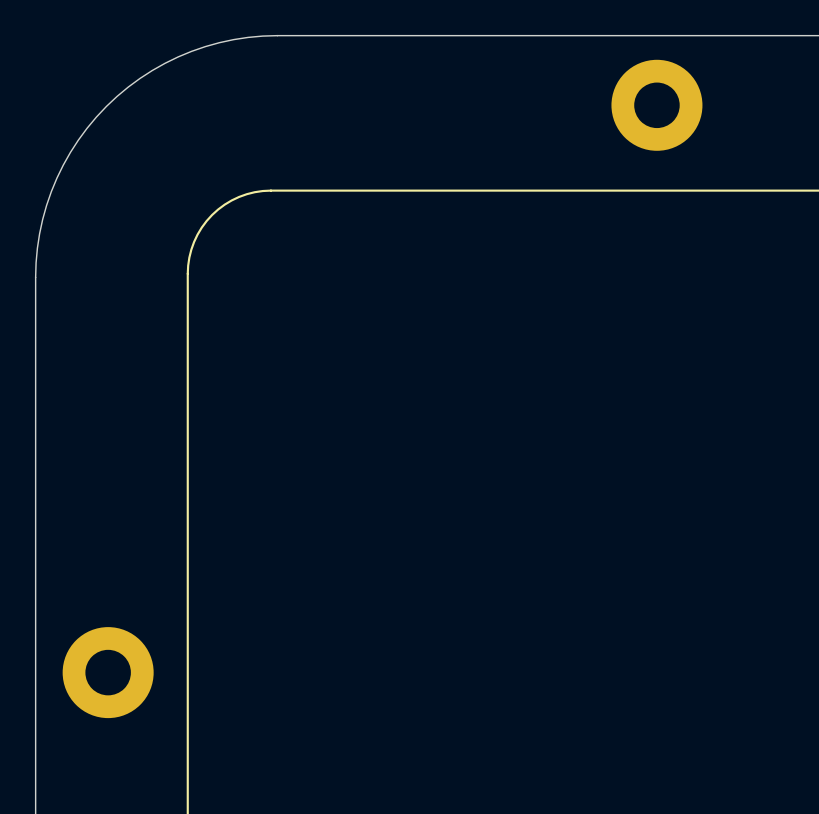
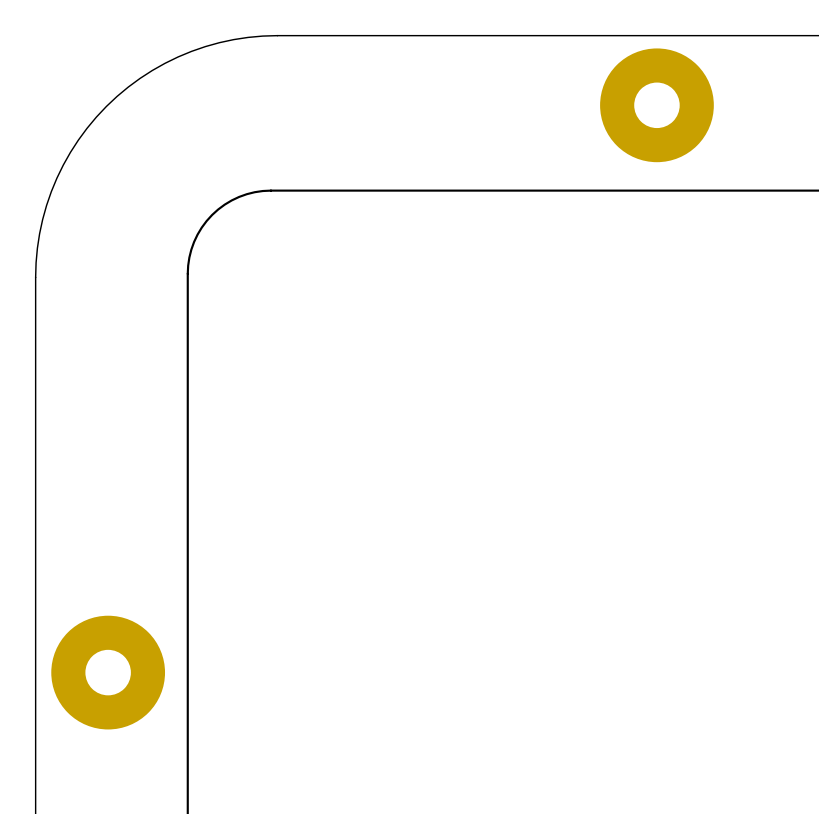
part footprint: [611, 59, 703, 151] -> [600, 48, 714, 163]
part footprint: [62, 627, 154, 719] -> [51, 615, 166, 730]

